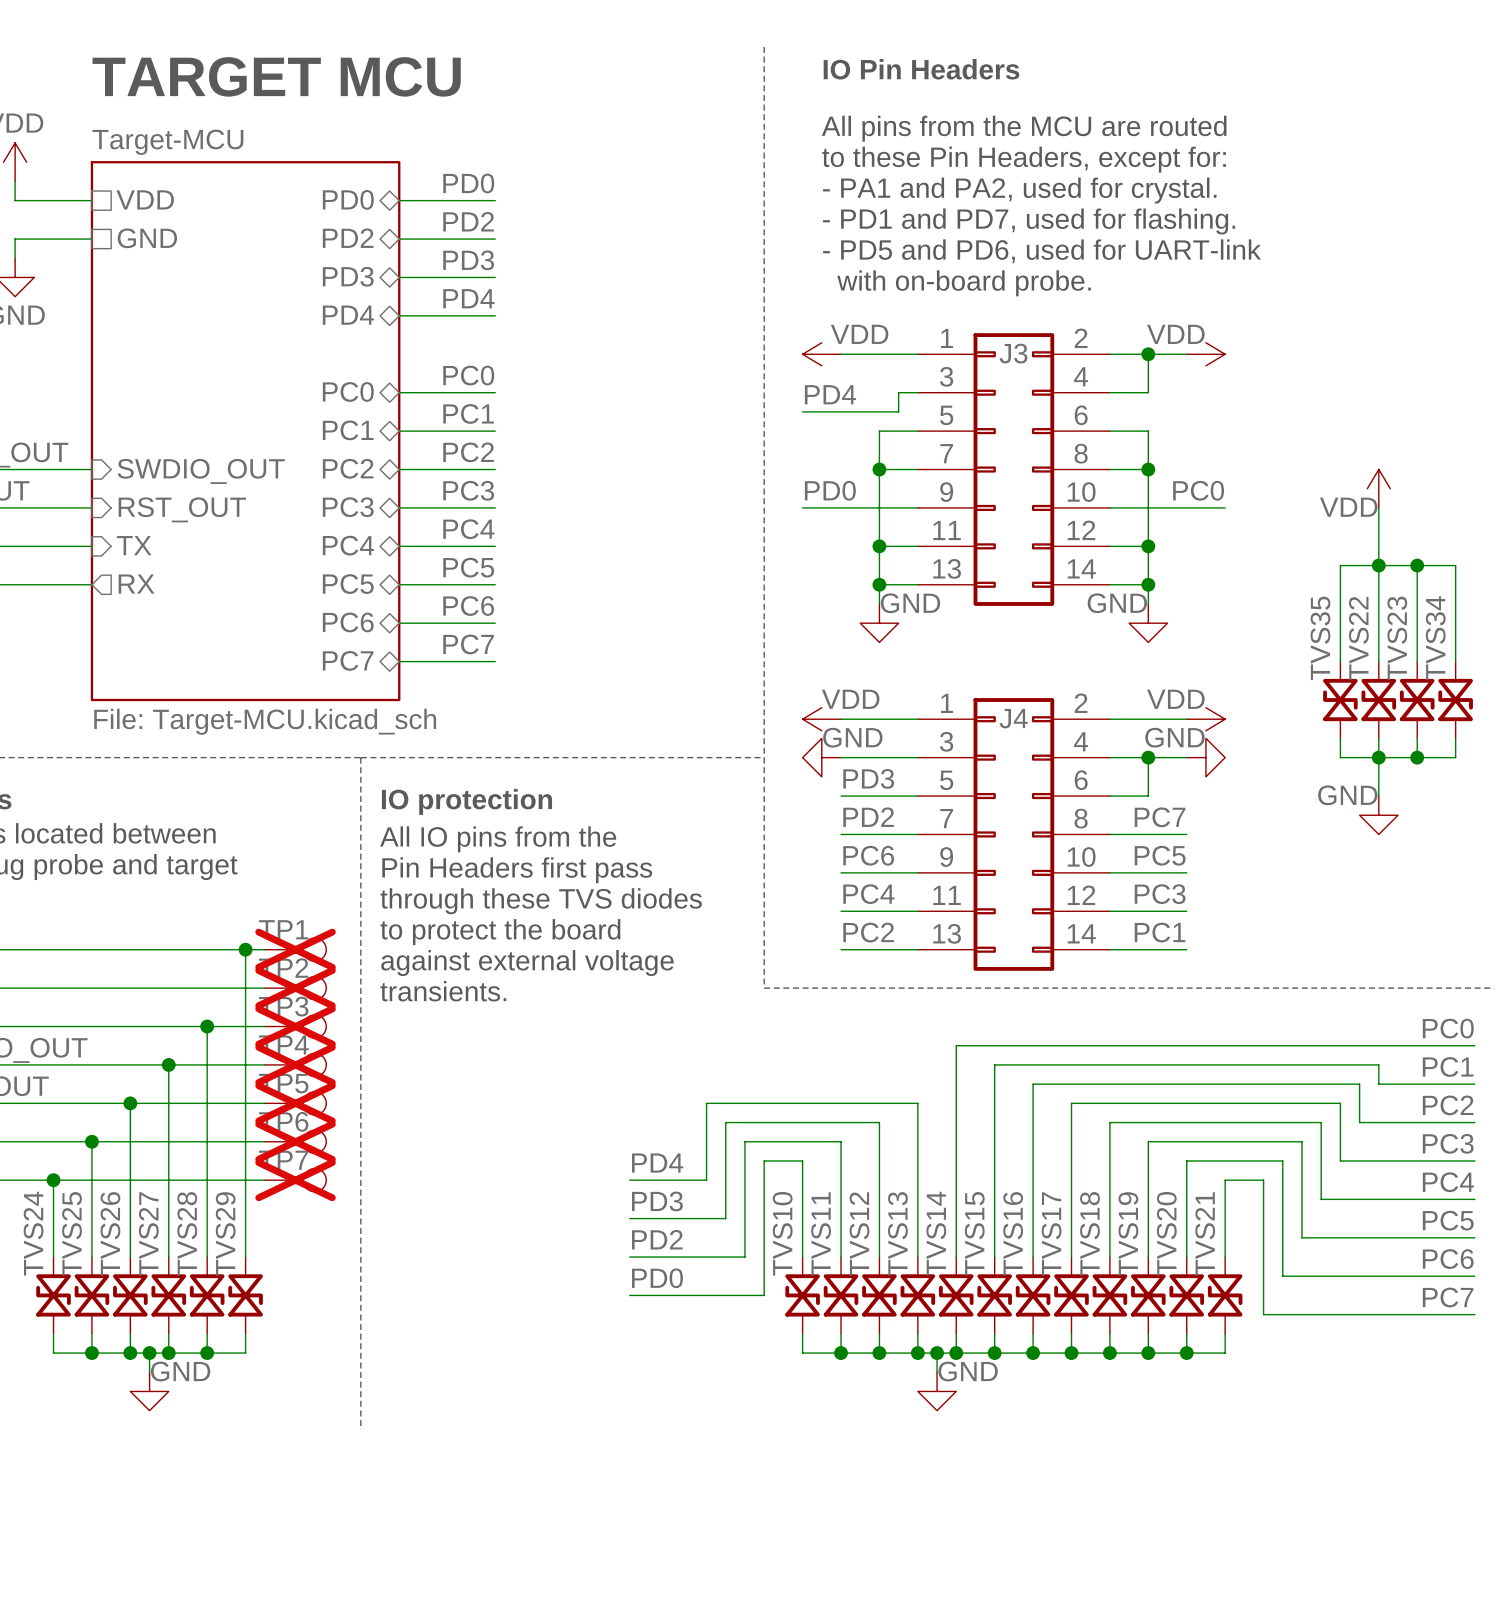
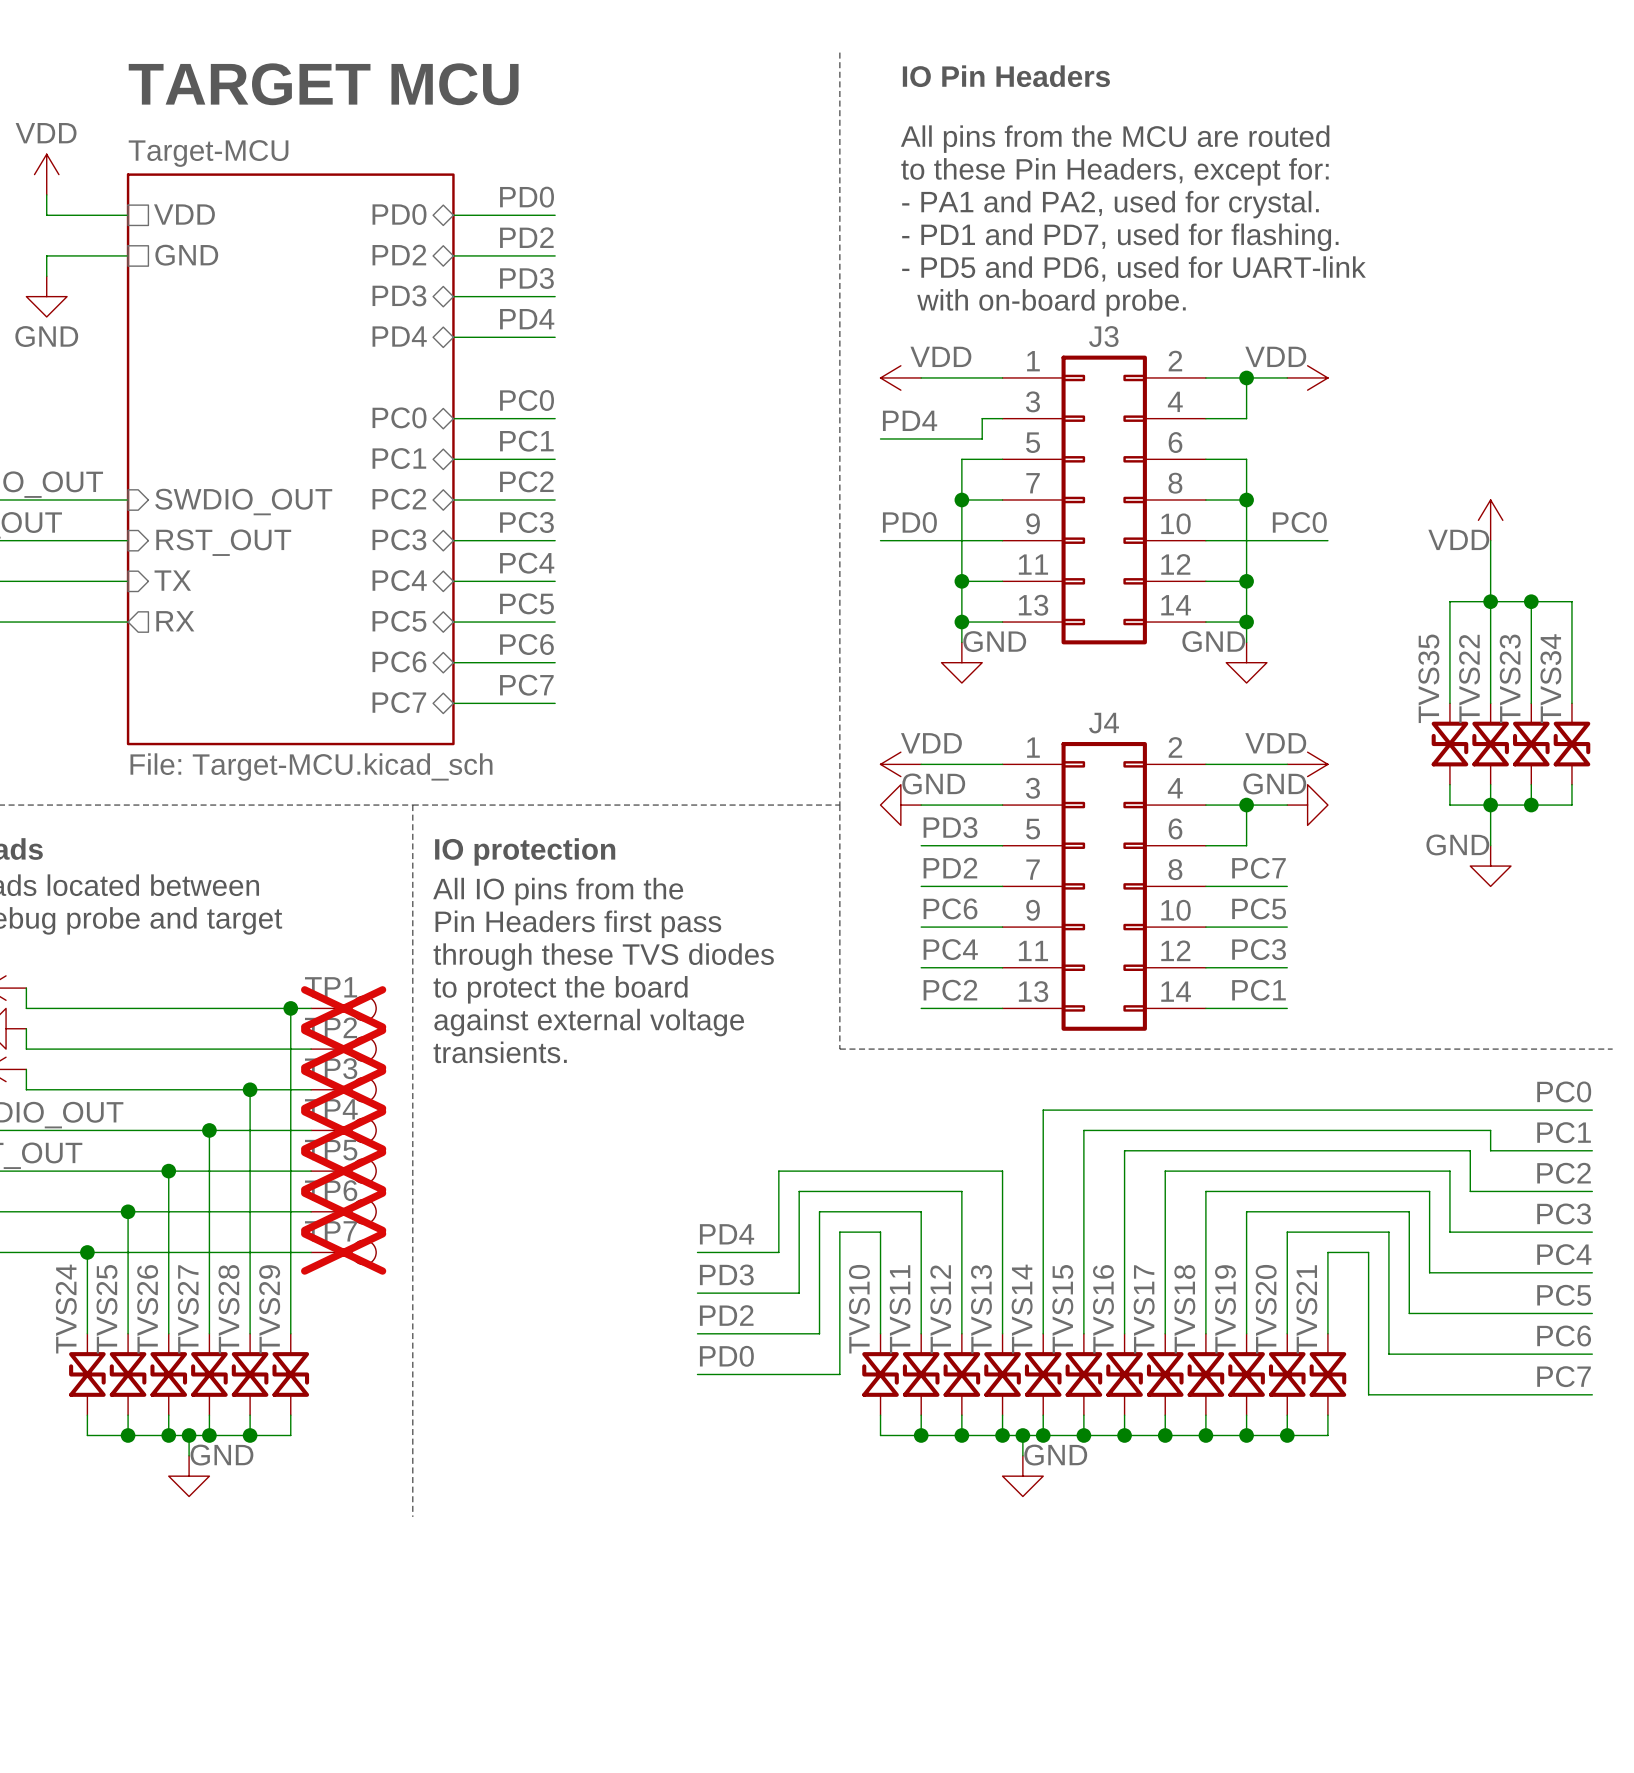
J3 name position: J3 (1013, 353) -> J3 (1103, 336)
J4 name position: J4 (1013, 718) -> J4 (1104, 723)

